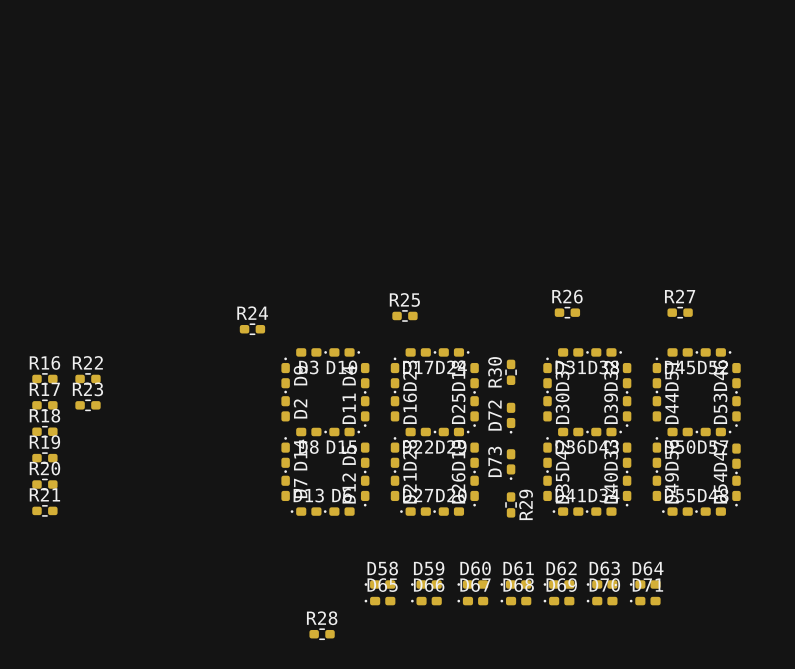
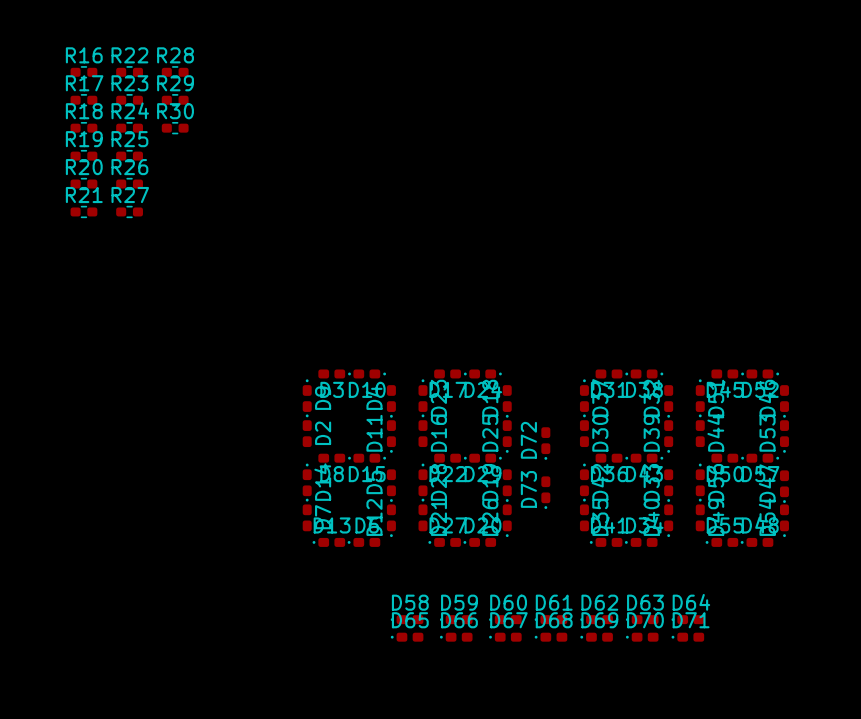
R26 position: (567, 312) -> (129, 184)
R27 position: (680, 312) -> (129, 211)
R25 position: (404, 315) -> (129, 156)
R24 position: (252, 329) -> (129, 128)
R30 rotation: 0° (511, 372) -> 90° clockwise (175, 128)
R30 position: (511, 372) -> (175, 128)
R16 position: (44, 378) -> (83, 72)
R22 position: (88, 378) -> (129, 72)
R17 position: (44, 405) -> (83, 100)
R23 position: (88, 405) -> (129, 100)
R18 position: (44, 431) -> (83, 128)
R19 position: (44, 458) -> (83, 156)
R20 position: (44, 484) -> (83, 184)
R29 rotation: 0° (511, 504) -> 90° clockwise (175, 100)
R29 position: (511, 504) -> (175, 100)
R21 position: (44, 510) -> (83, 211)
R28 position: (322, 634) -> (175, 72)

